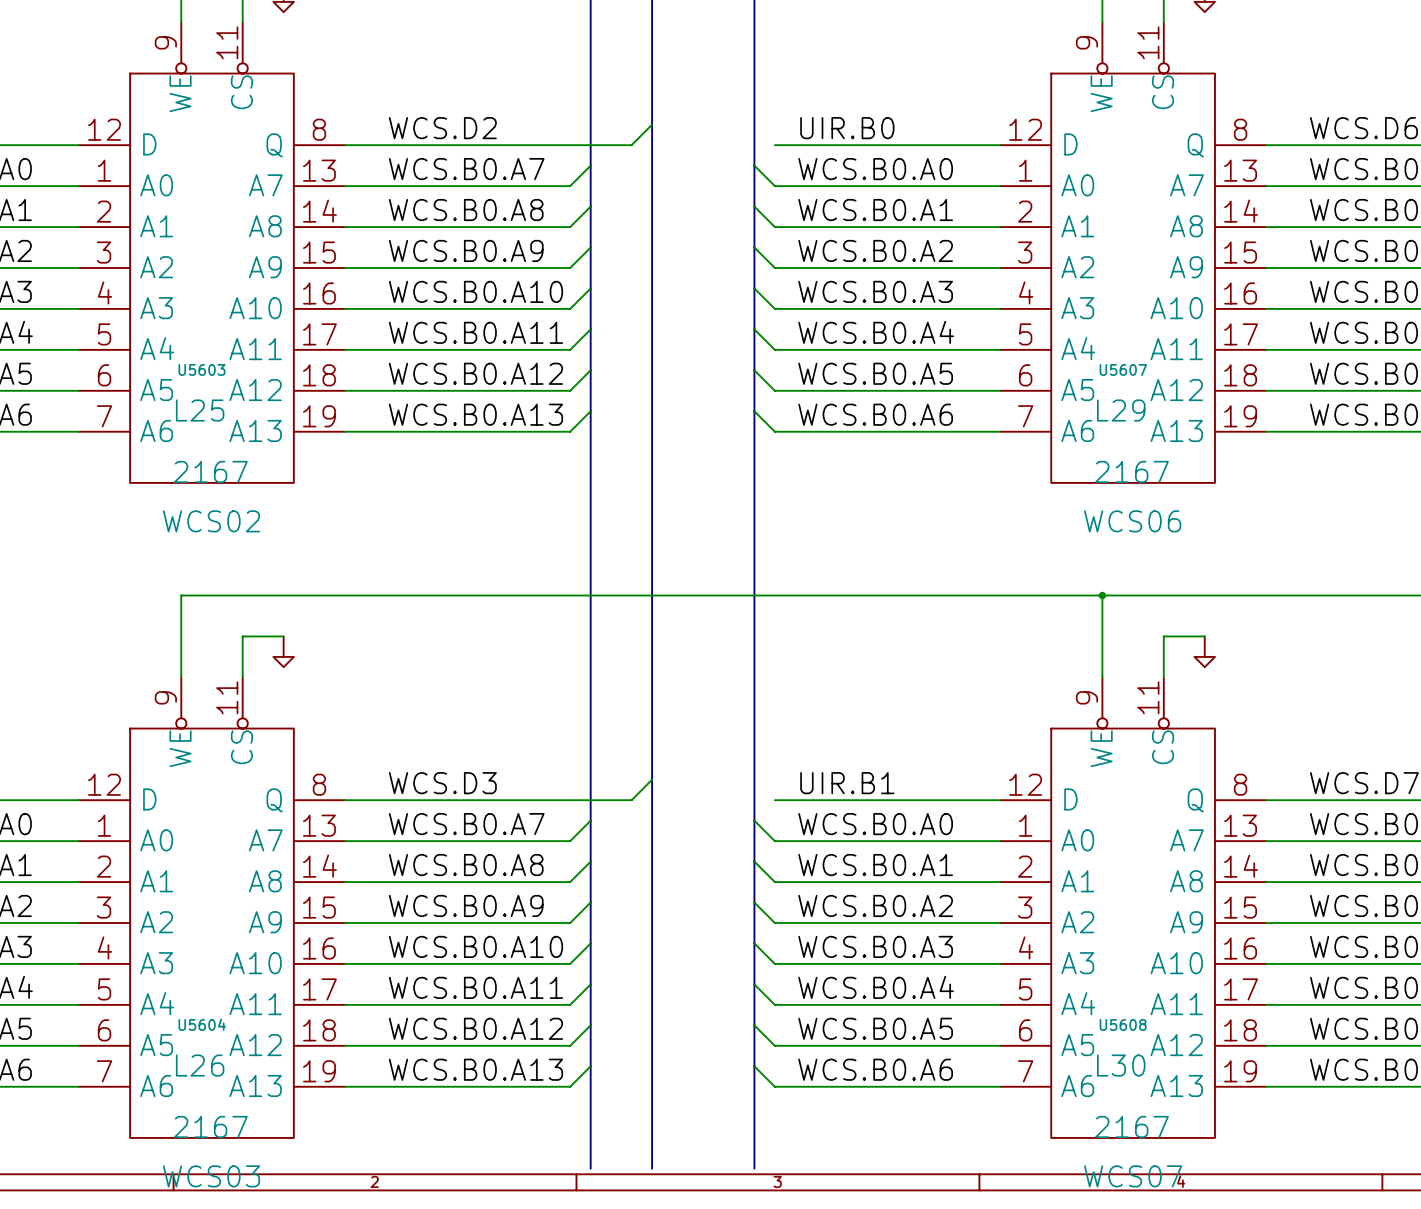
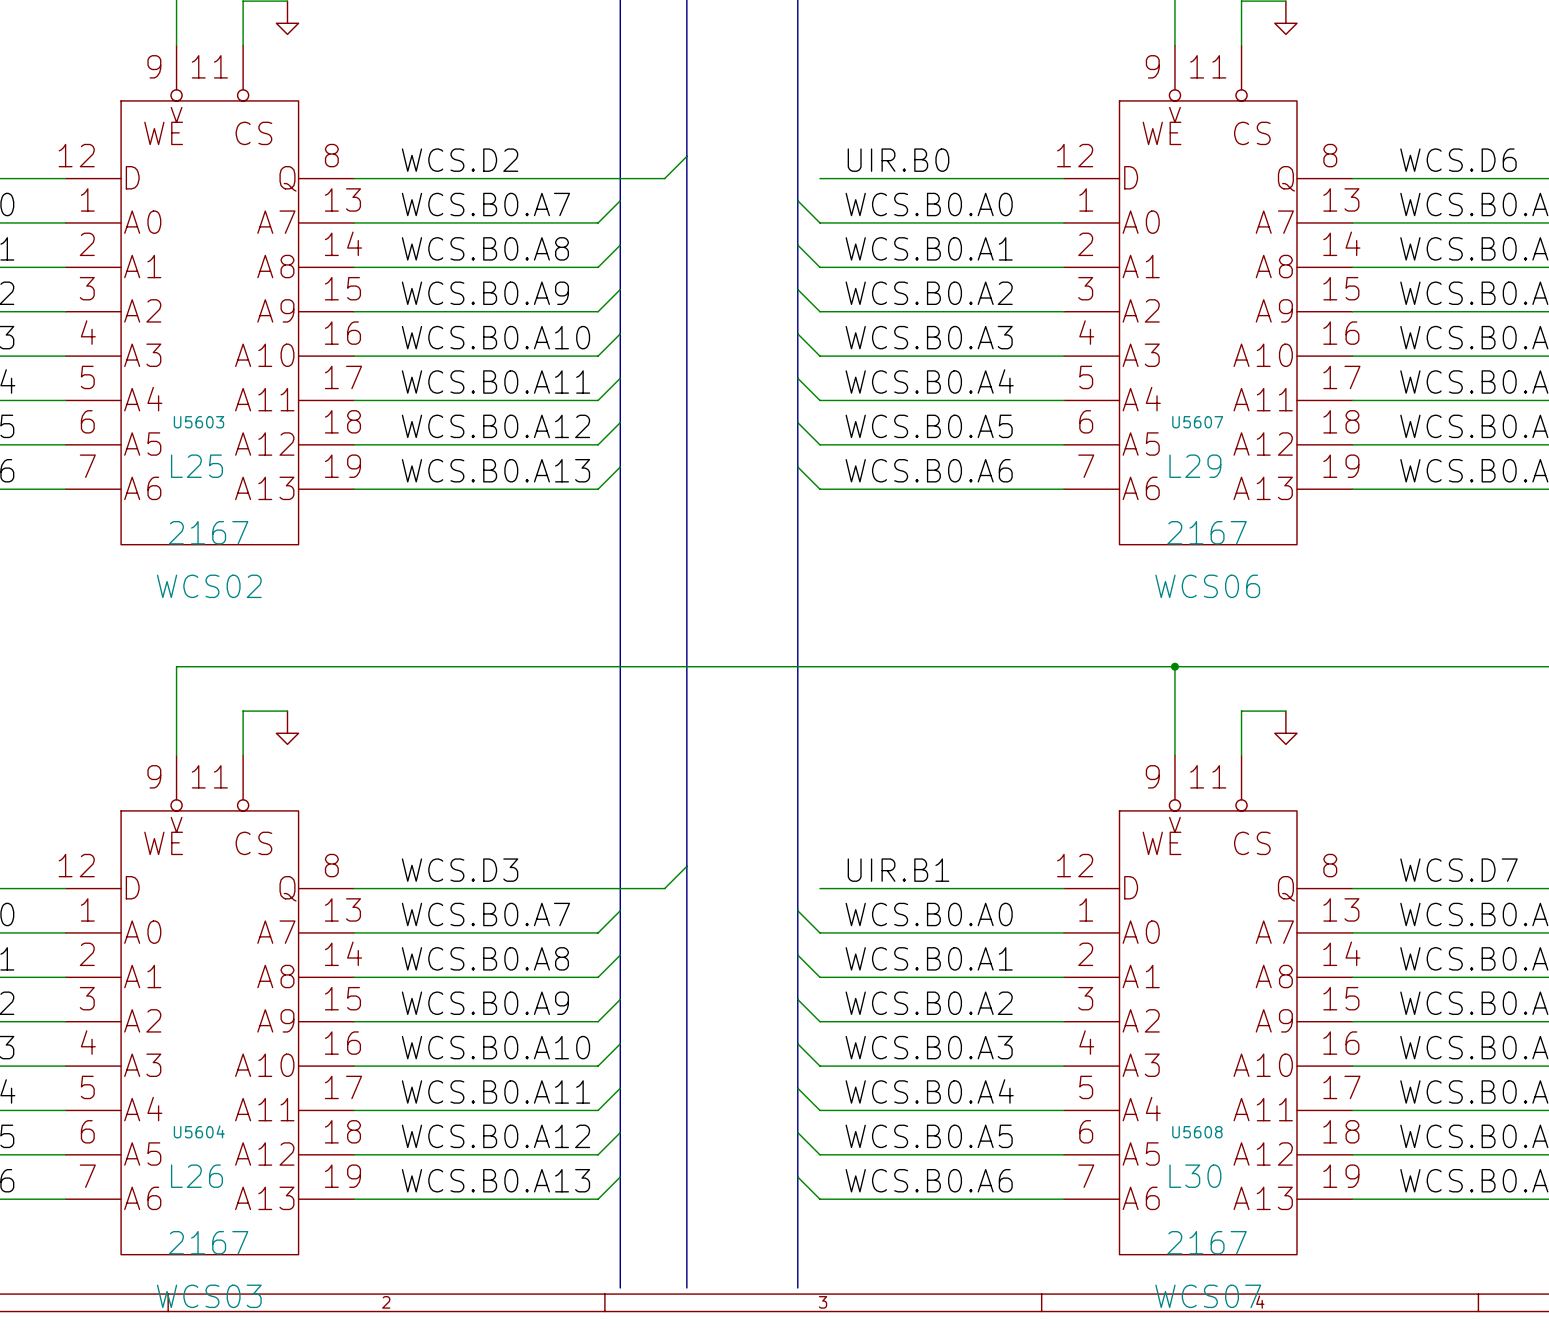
U5603 symbol: [78, 22, 346, 483] -> [65, 45, 355, 545]
U5607 symbol: [1000, 22, 1267, 483] -> [1064, 45, 1353, 545]
U5604 symbol: [78, 677, 346, 1138] -> [65, 755, 355, 1255]
U5608 symbol: [1000, 677, 1267, 1138] -> [1064, 755, 1353, 1255]

